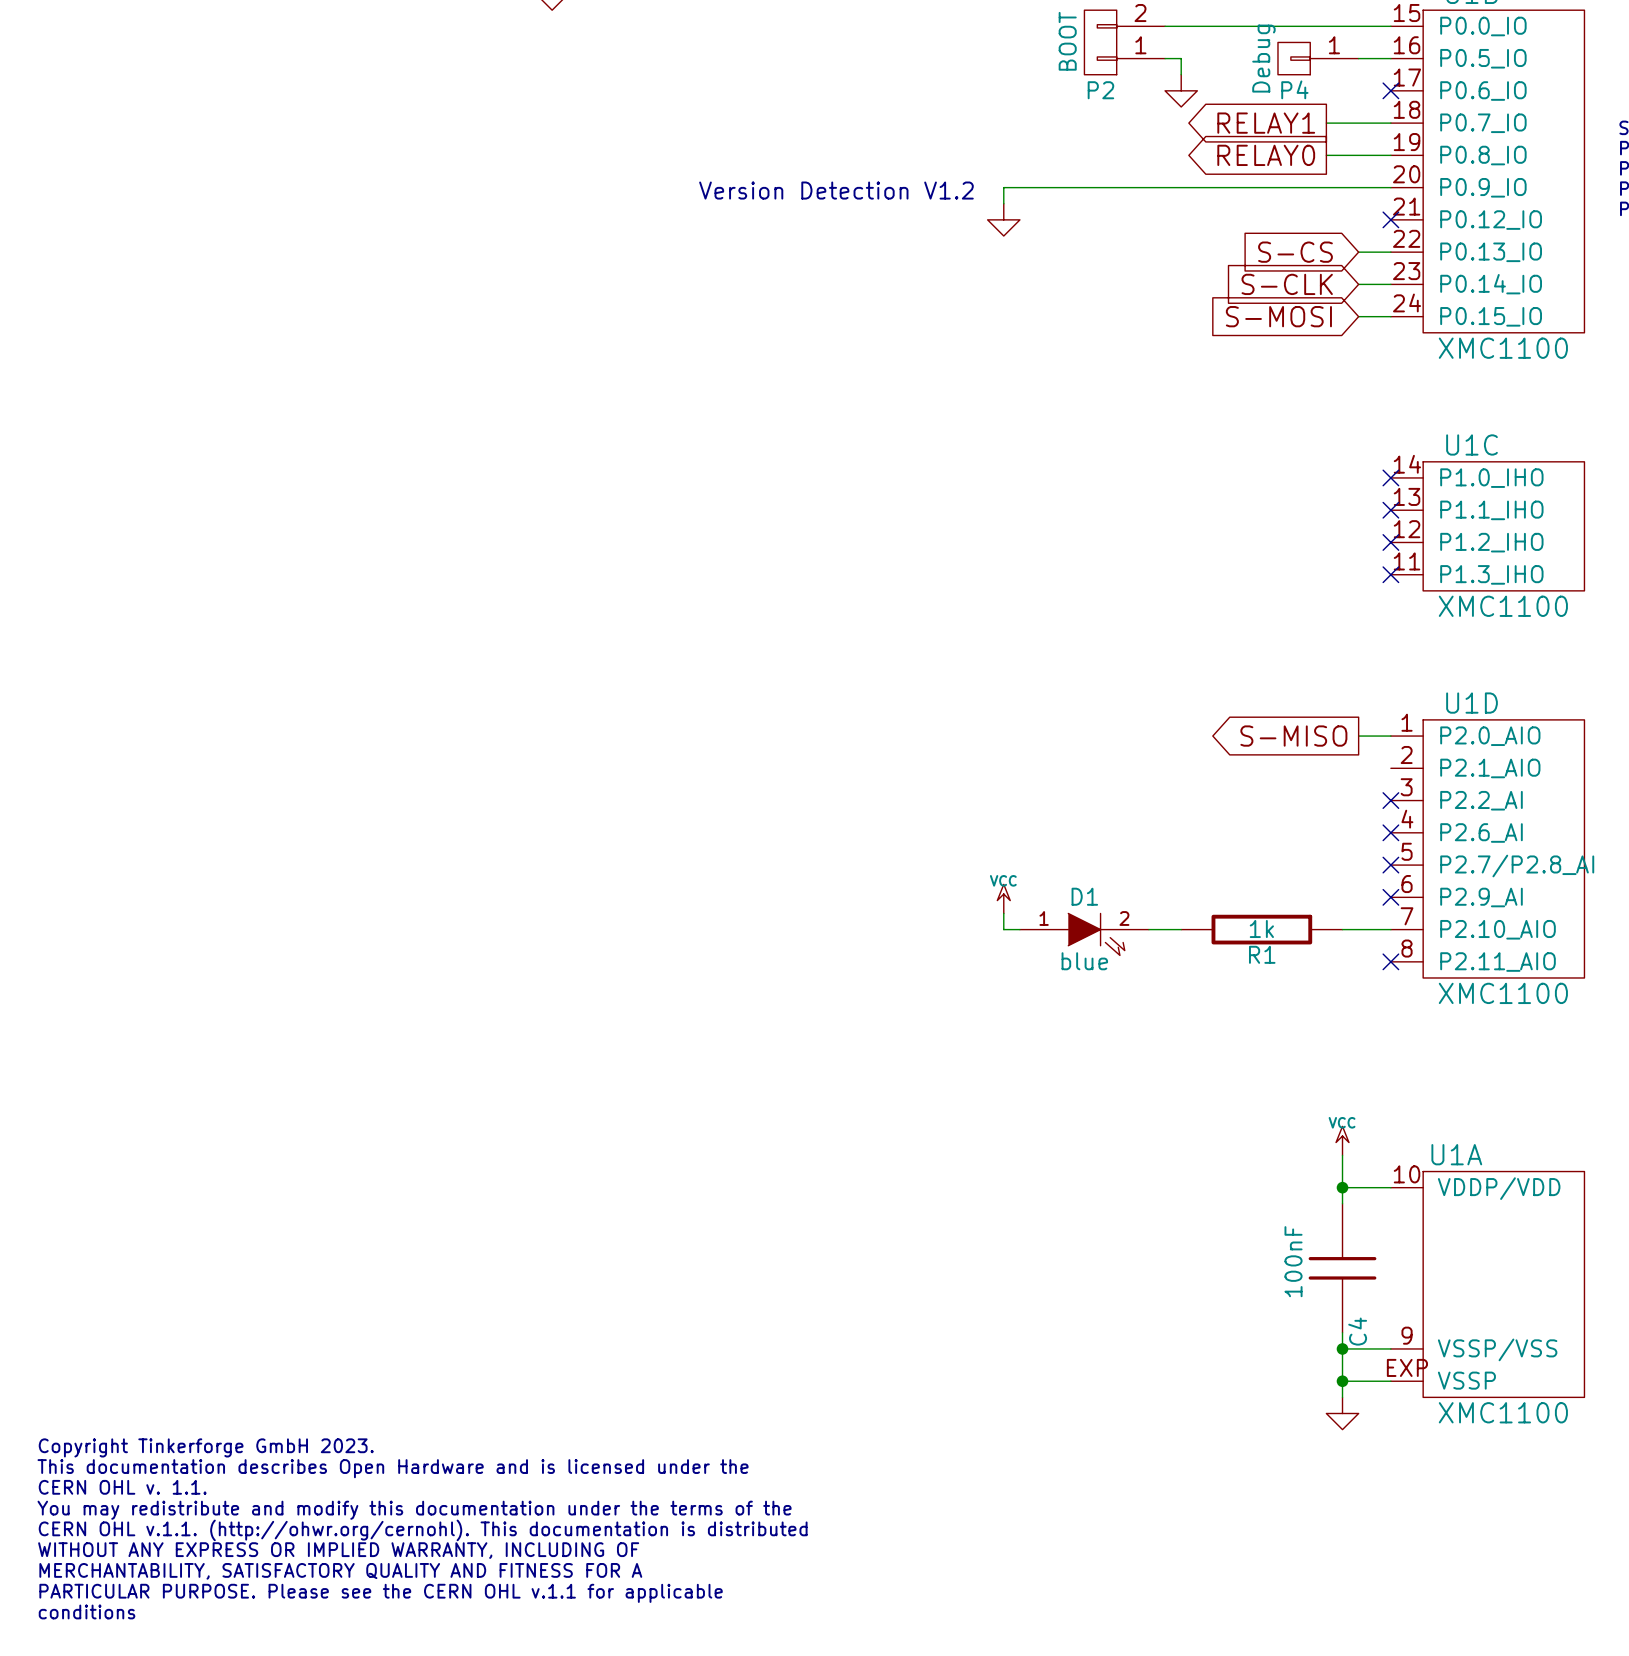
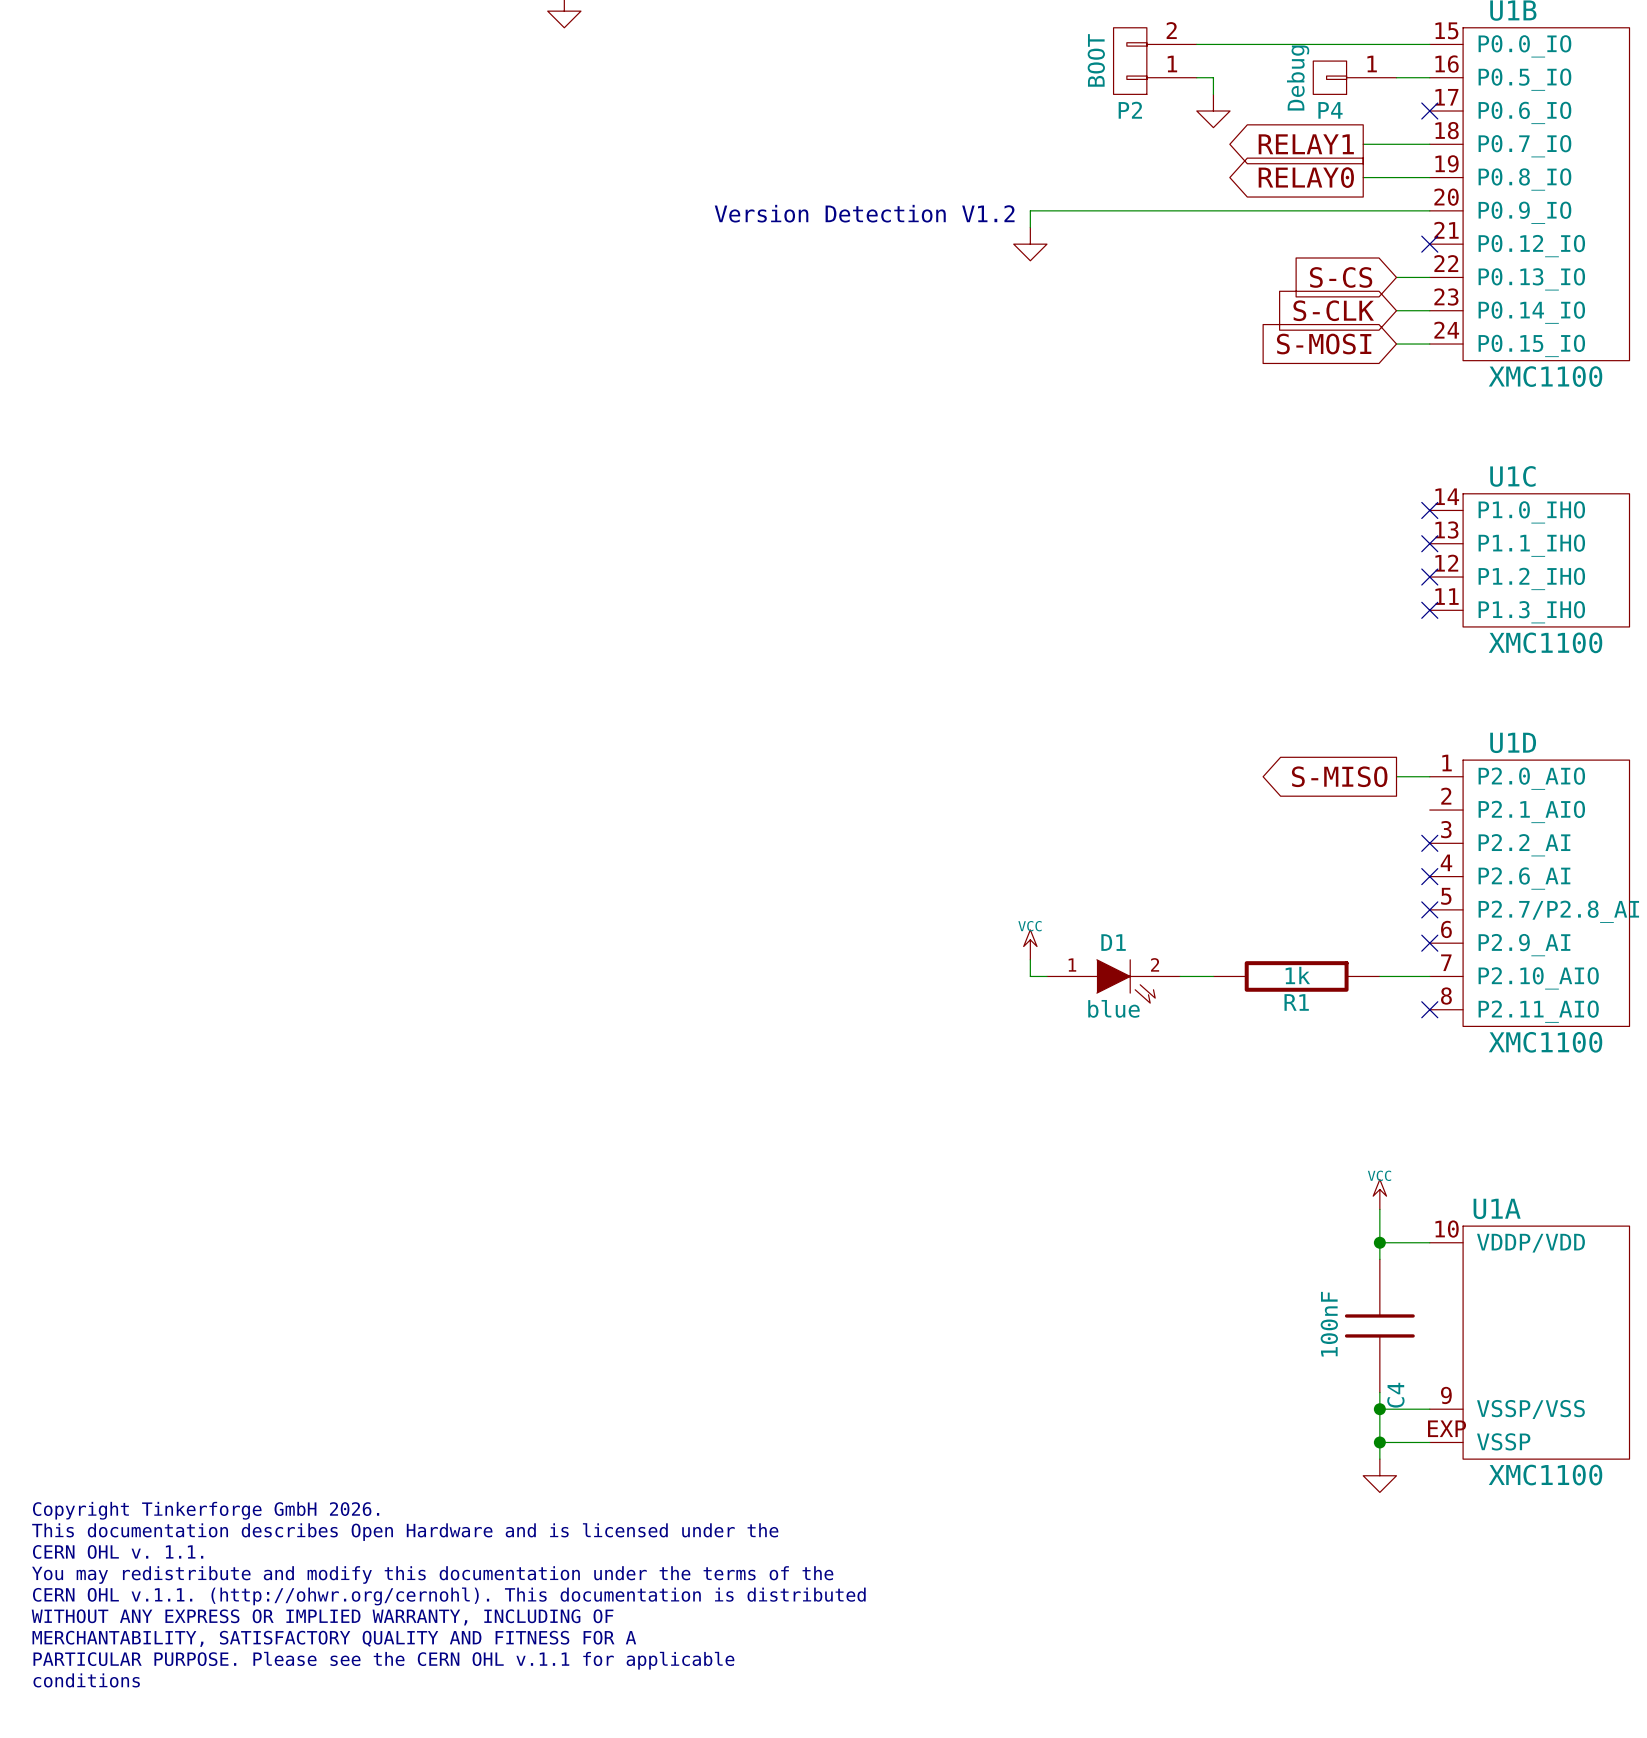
text: Copyright Tinkerforge GmbH 2023. (206, 1447) -> Copyright Tinkerforge GmbH 2026. (206, 1510)

